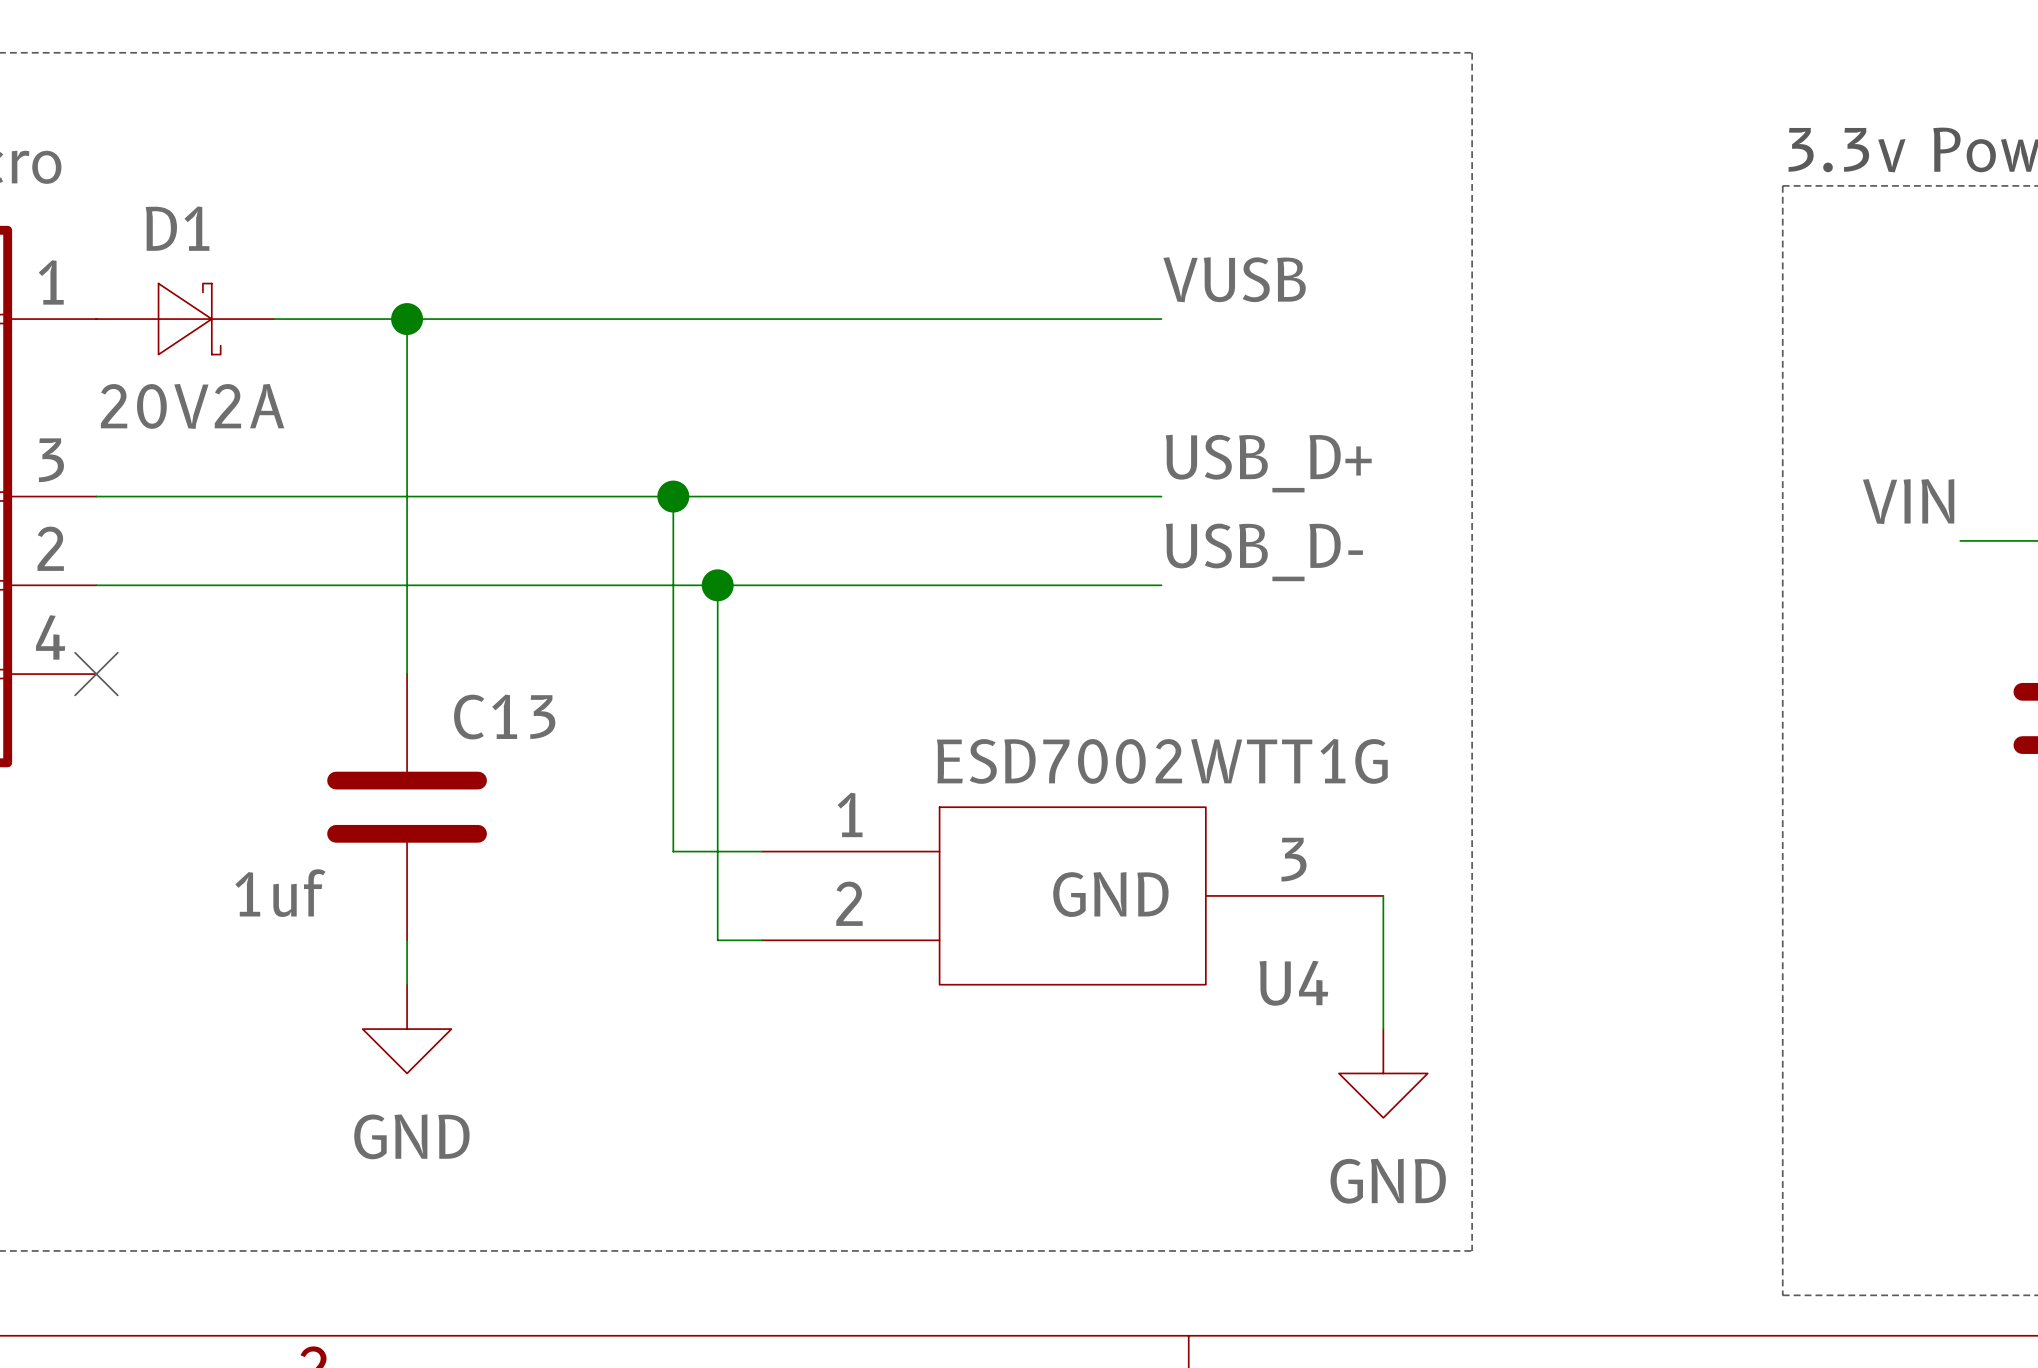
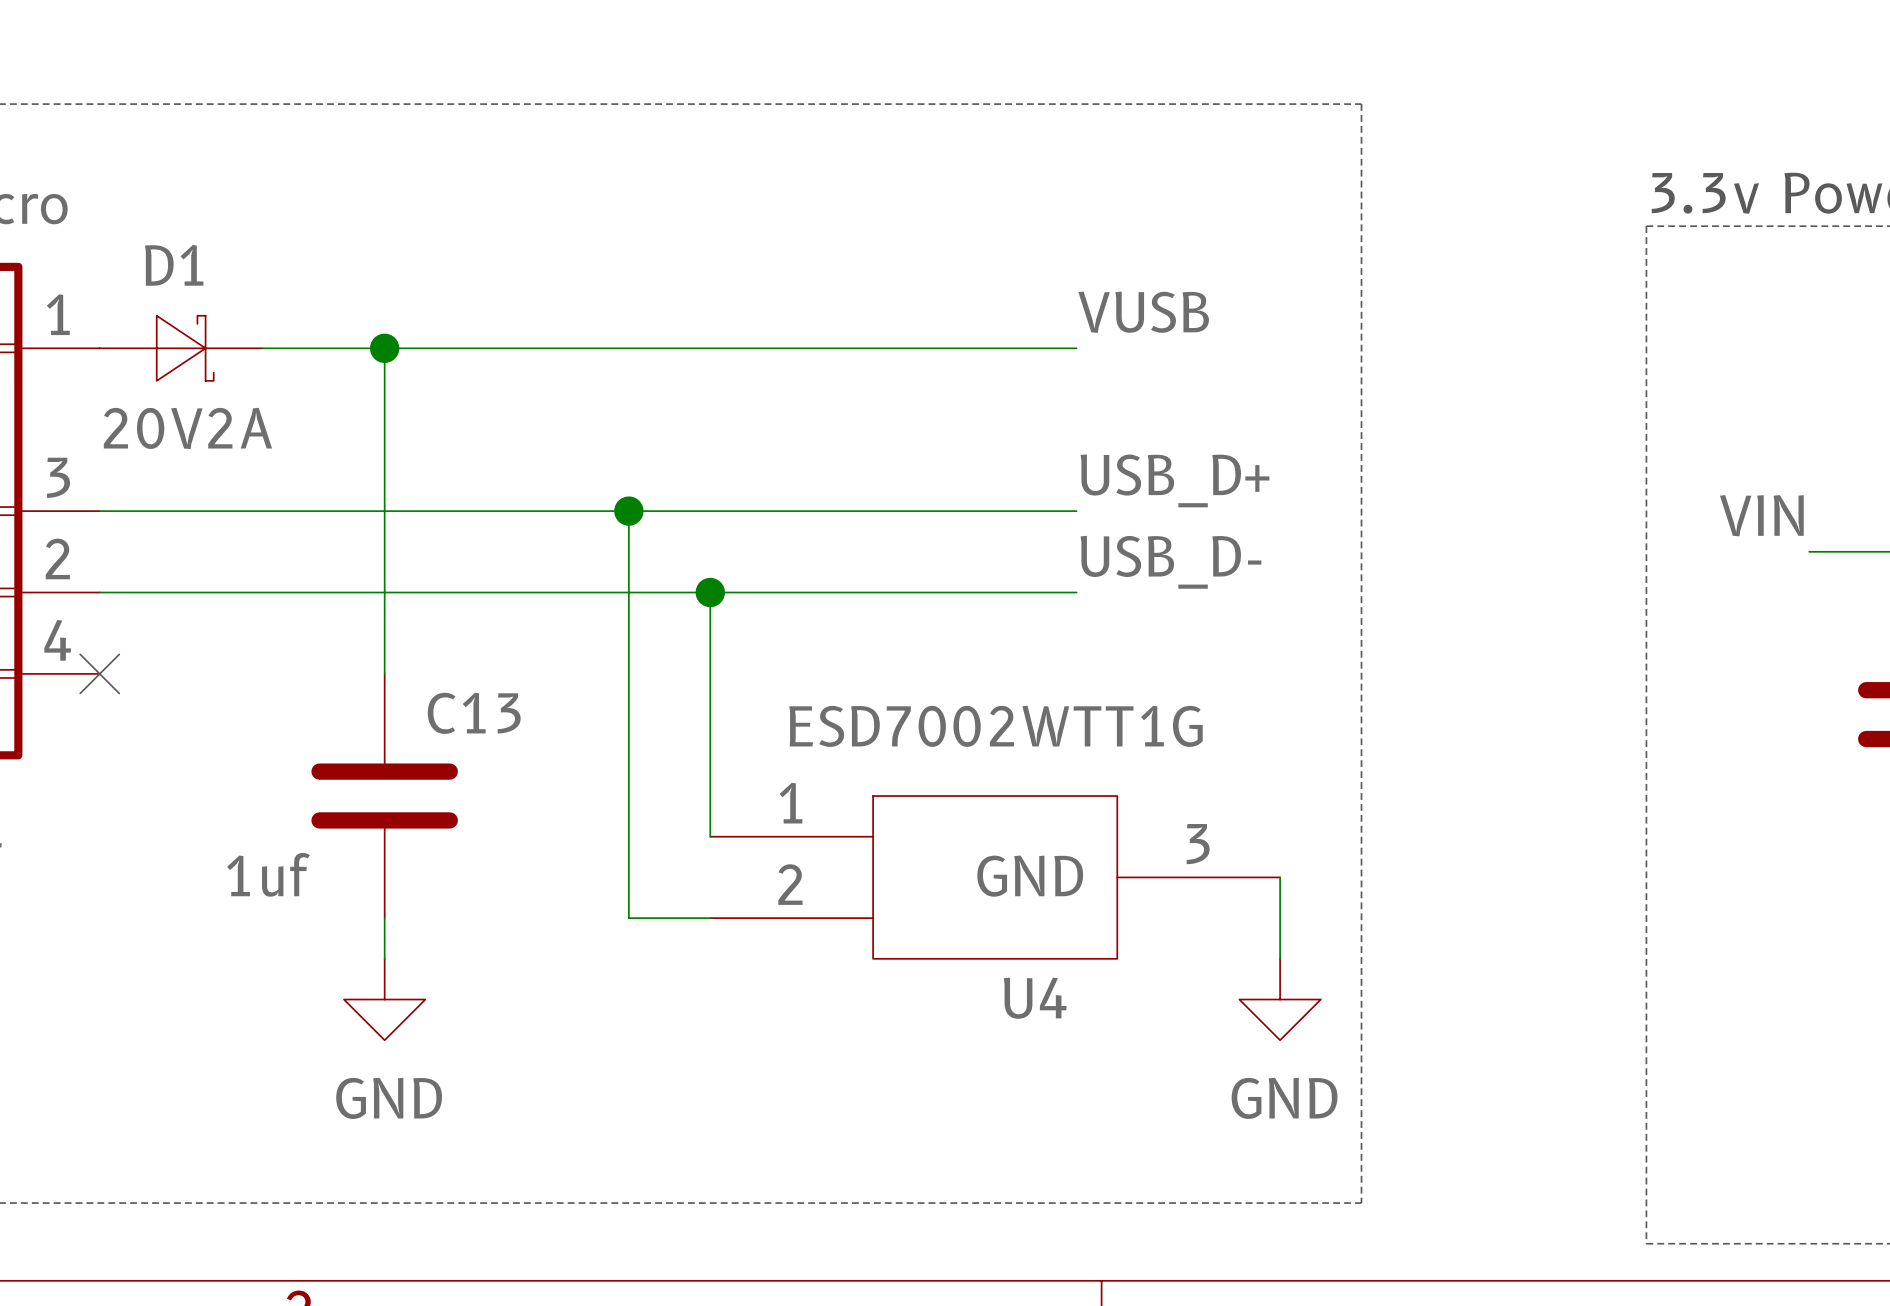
wire: (717, 585) (717, 940) -> none
junction position: (717, 585) -> (710, 592)
wire: none -> (710, 592) (710, 836)
U4 value position: ESD7002WTT1G (1162, 761) -> ESD7002WTT1G (995, 726)
wire: (673, 851) (762, 851) -> (628, 836) (628, 918) (669, 918)
U4 name position: U4 (1293, 983) -> U4 (1035, 998)
power symbol position: GND (1383, 1073) -> GND (1280, 999)

